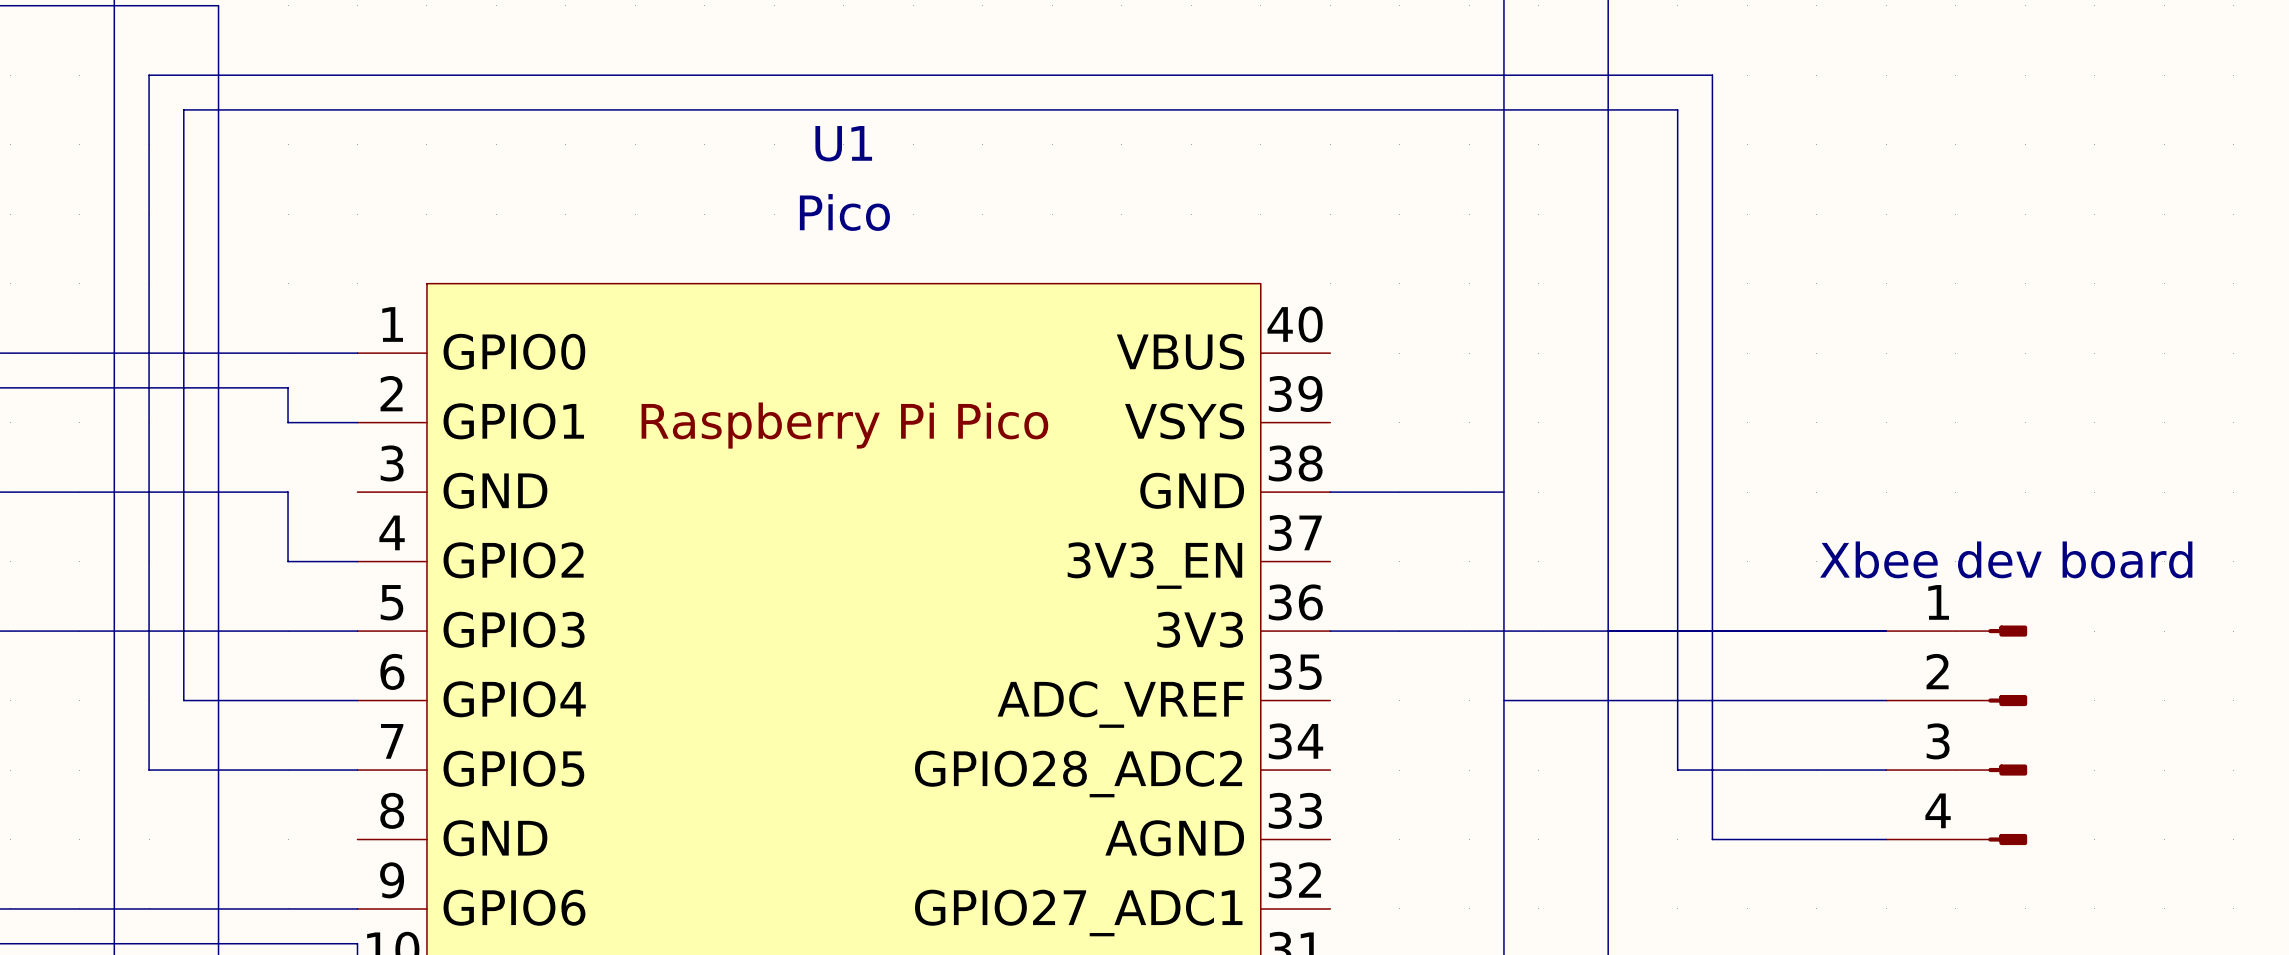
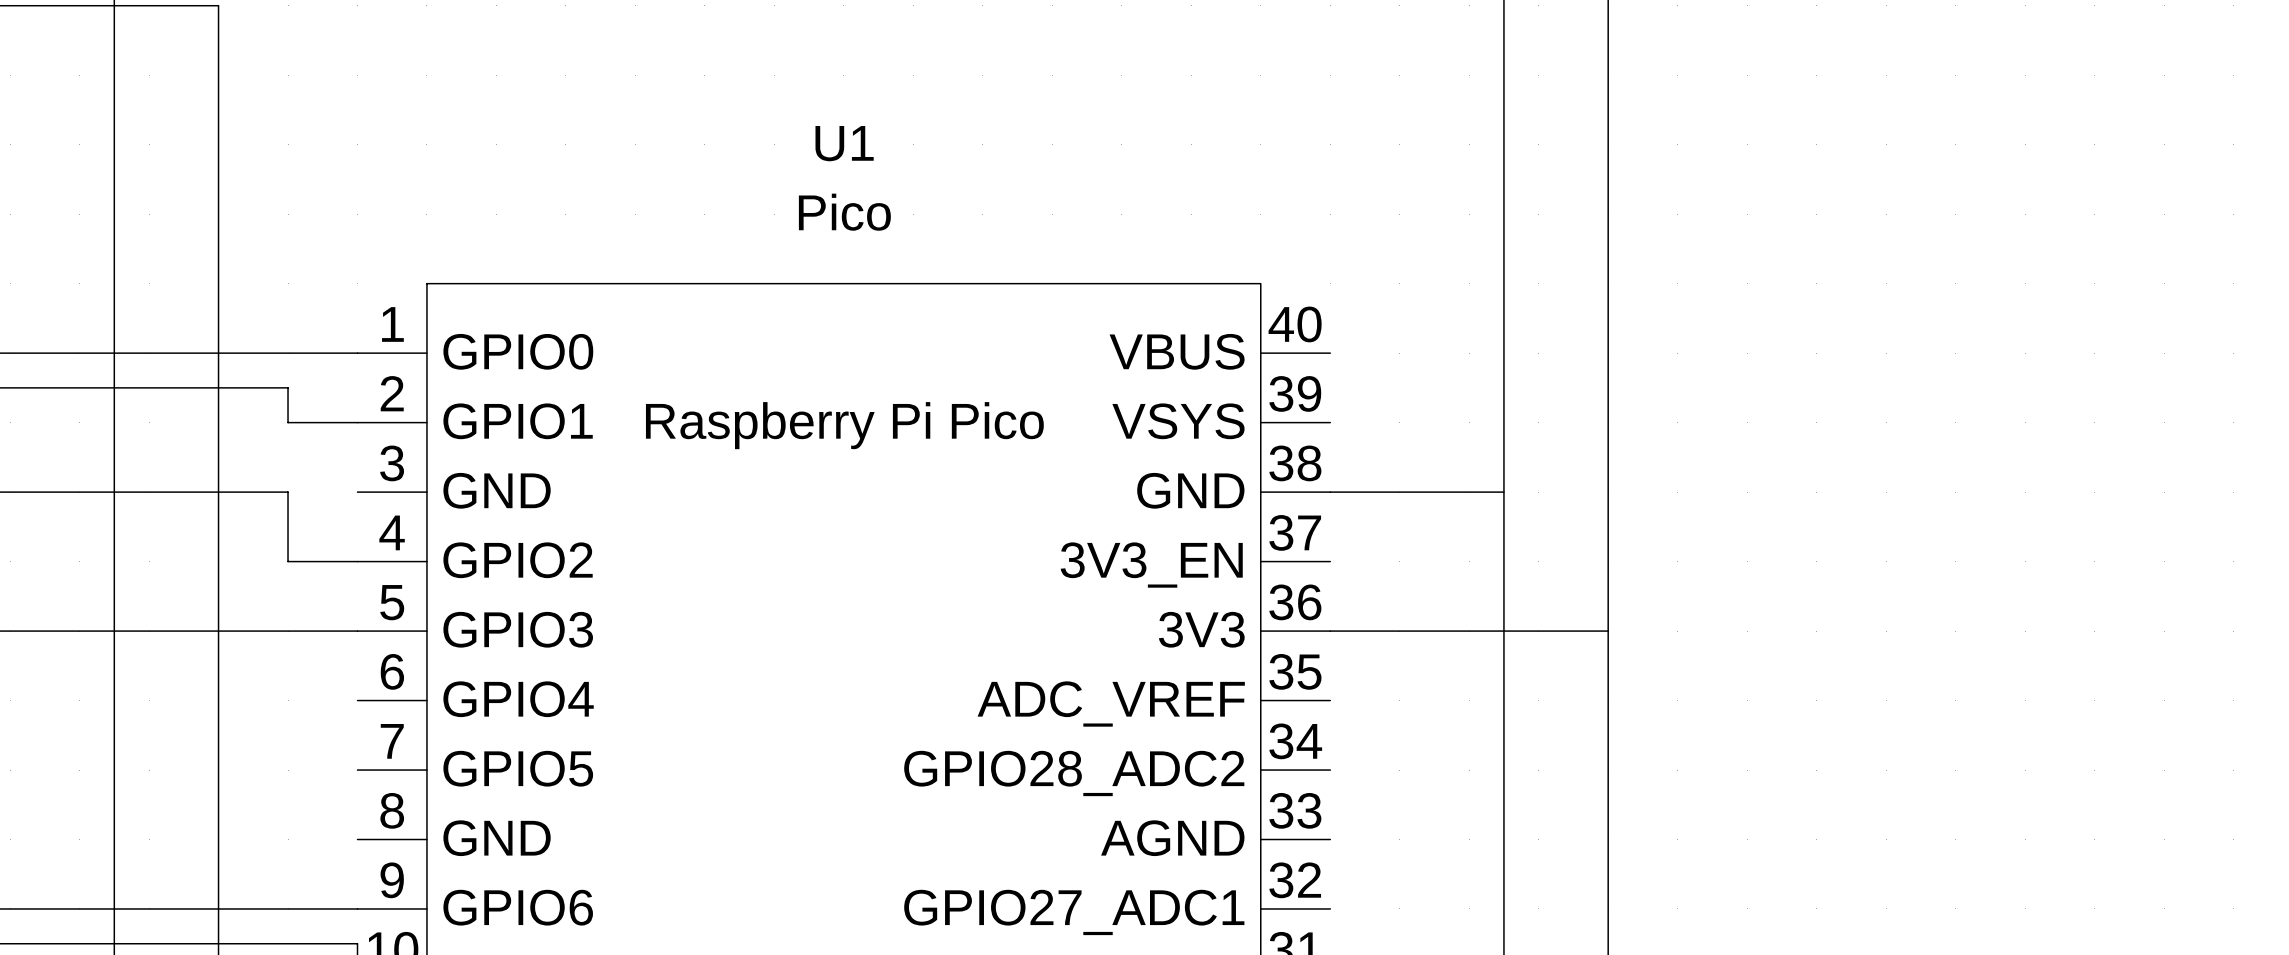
wire: (1608, 631) (1886, 631) -> none
wire: (357, 700) (183, 700) (183, 109) (1677, 109) (1677, 770) (1886, 770) -> none
wire: (1503, 700) (1886, 700) -> none
part: Xbee dev board (1956, 735) -> none
wire: (357, 770) (149, 770) (149, 75) (1712, 75) (1712, 839) (1886, 839) -> none

